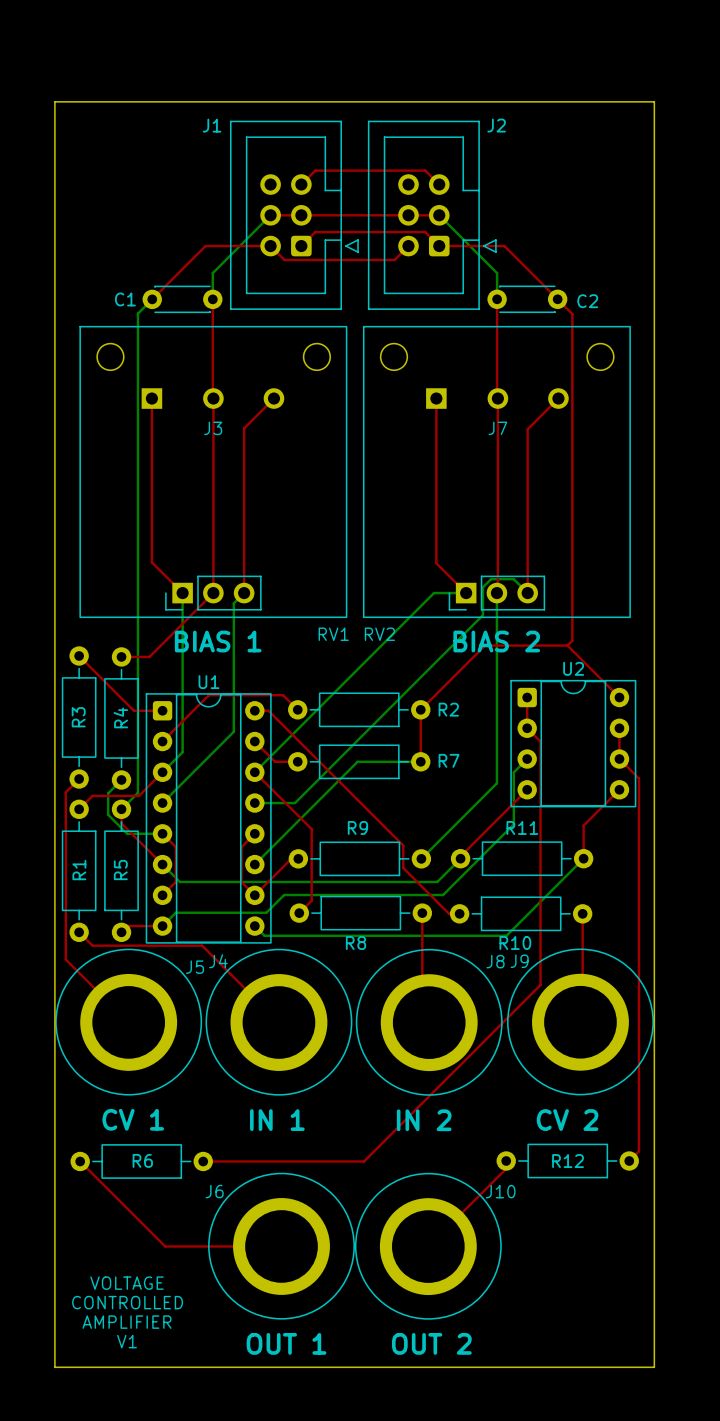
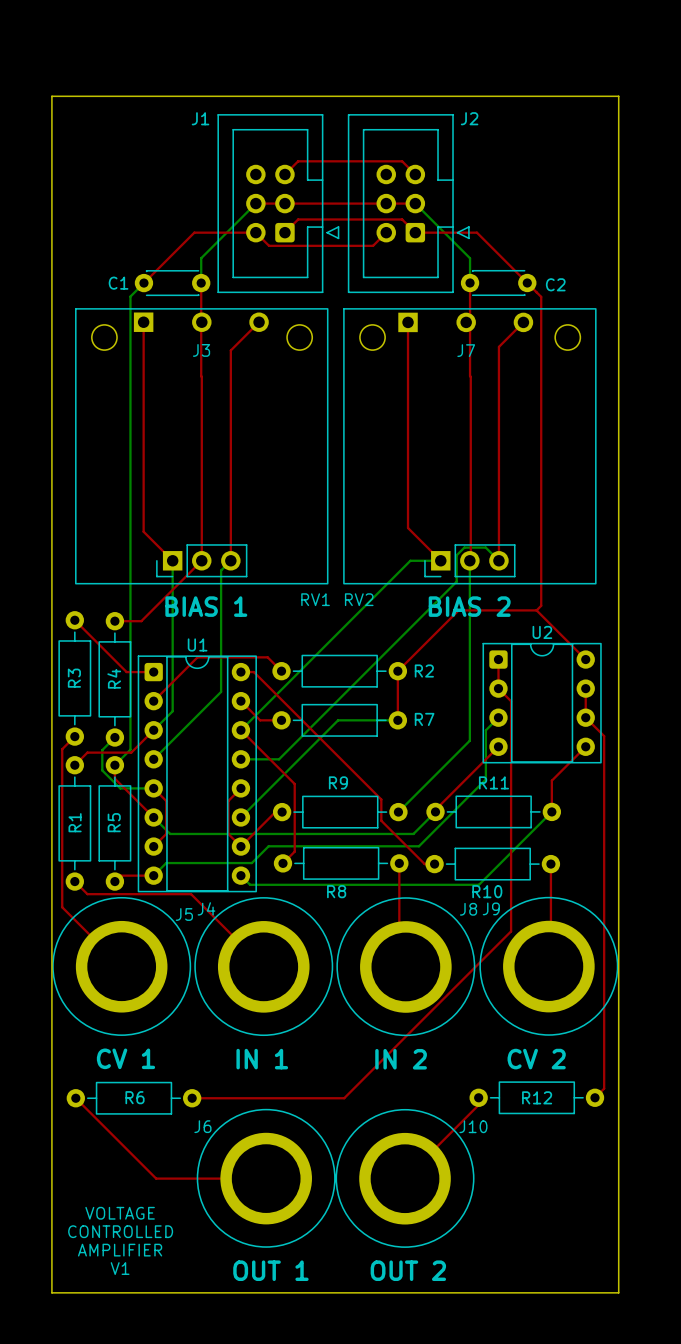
top track: none -> (143, 322) (143, 376)
J3 position: (212, 398) -> (201, 322)
top track: (273, 398) (244, 428) -> (259, 322) (230, 350) (230, 405)
top track: (436, 398) (436, 563) -> (408, 322) (408, 528) (412, 532)
J7 position: (497, 398) -> (465, 322)
top track: (558, 398) (527, 429) -> (523, 322) (498, 346) (498, 405)

